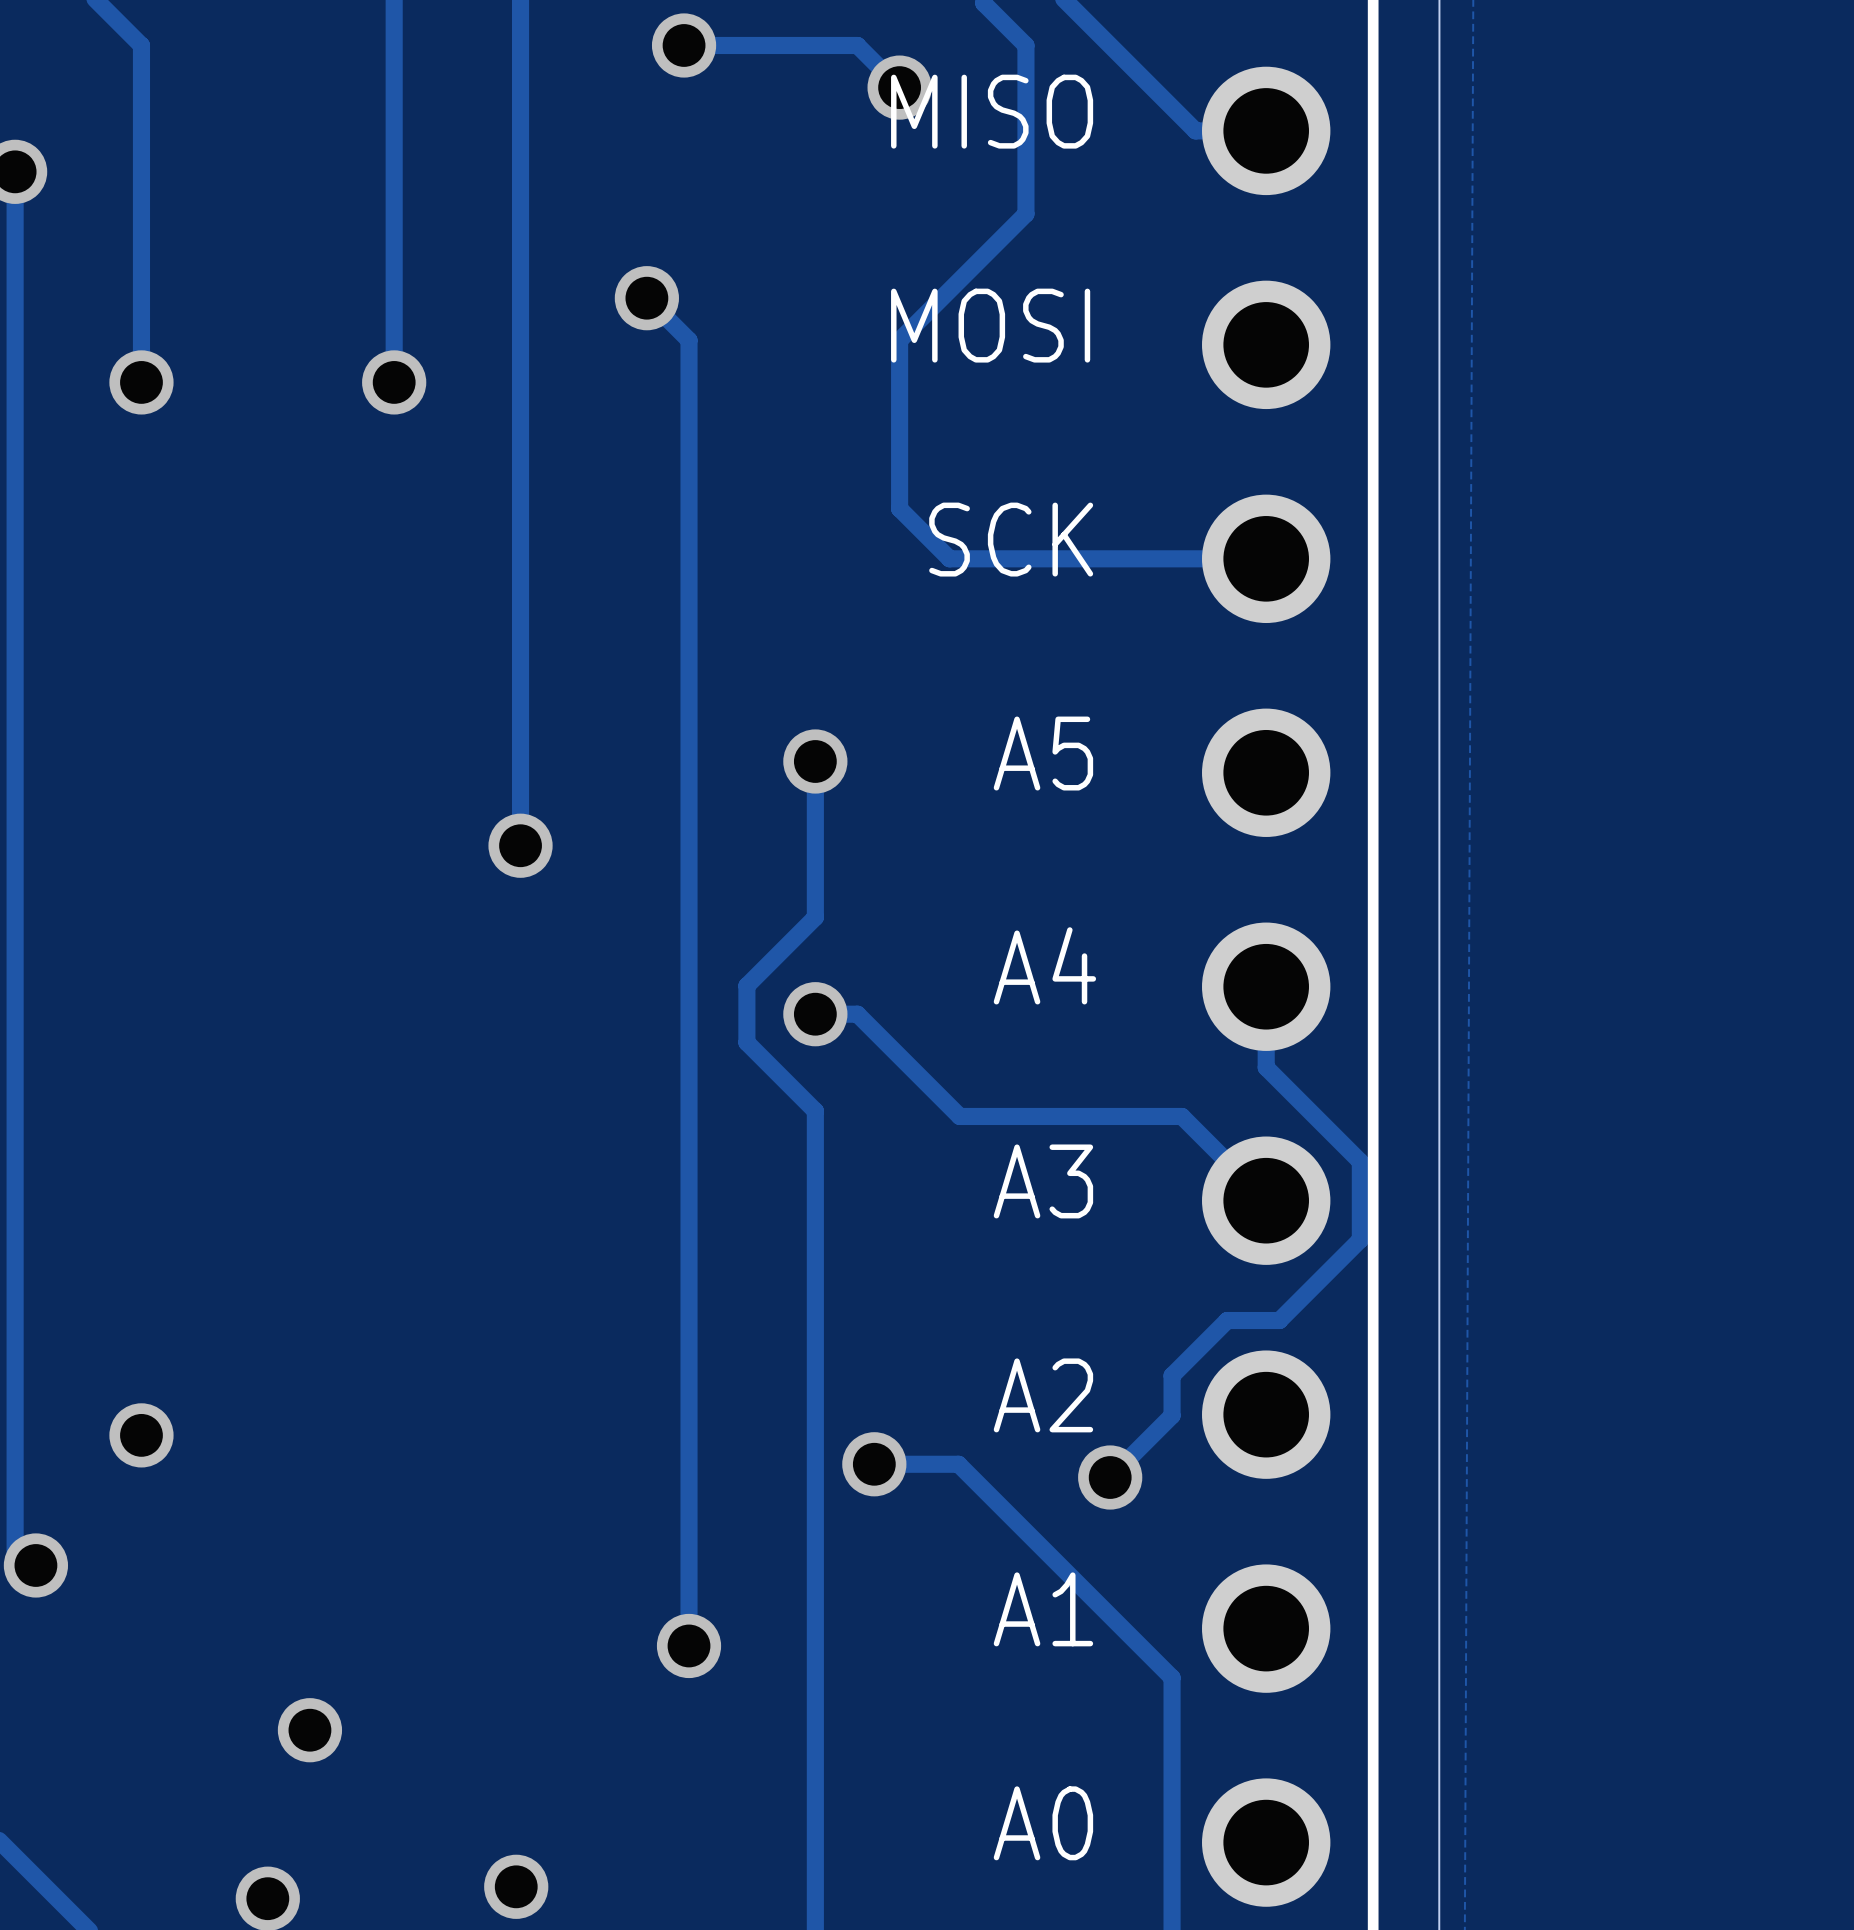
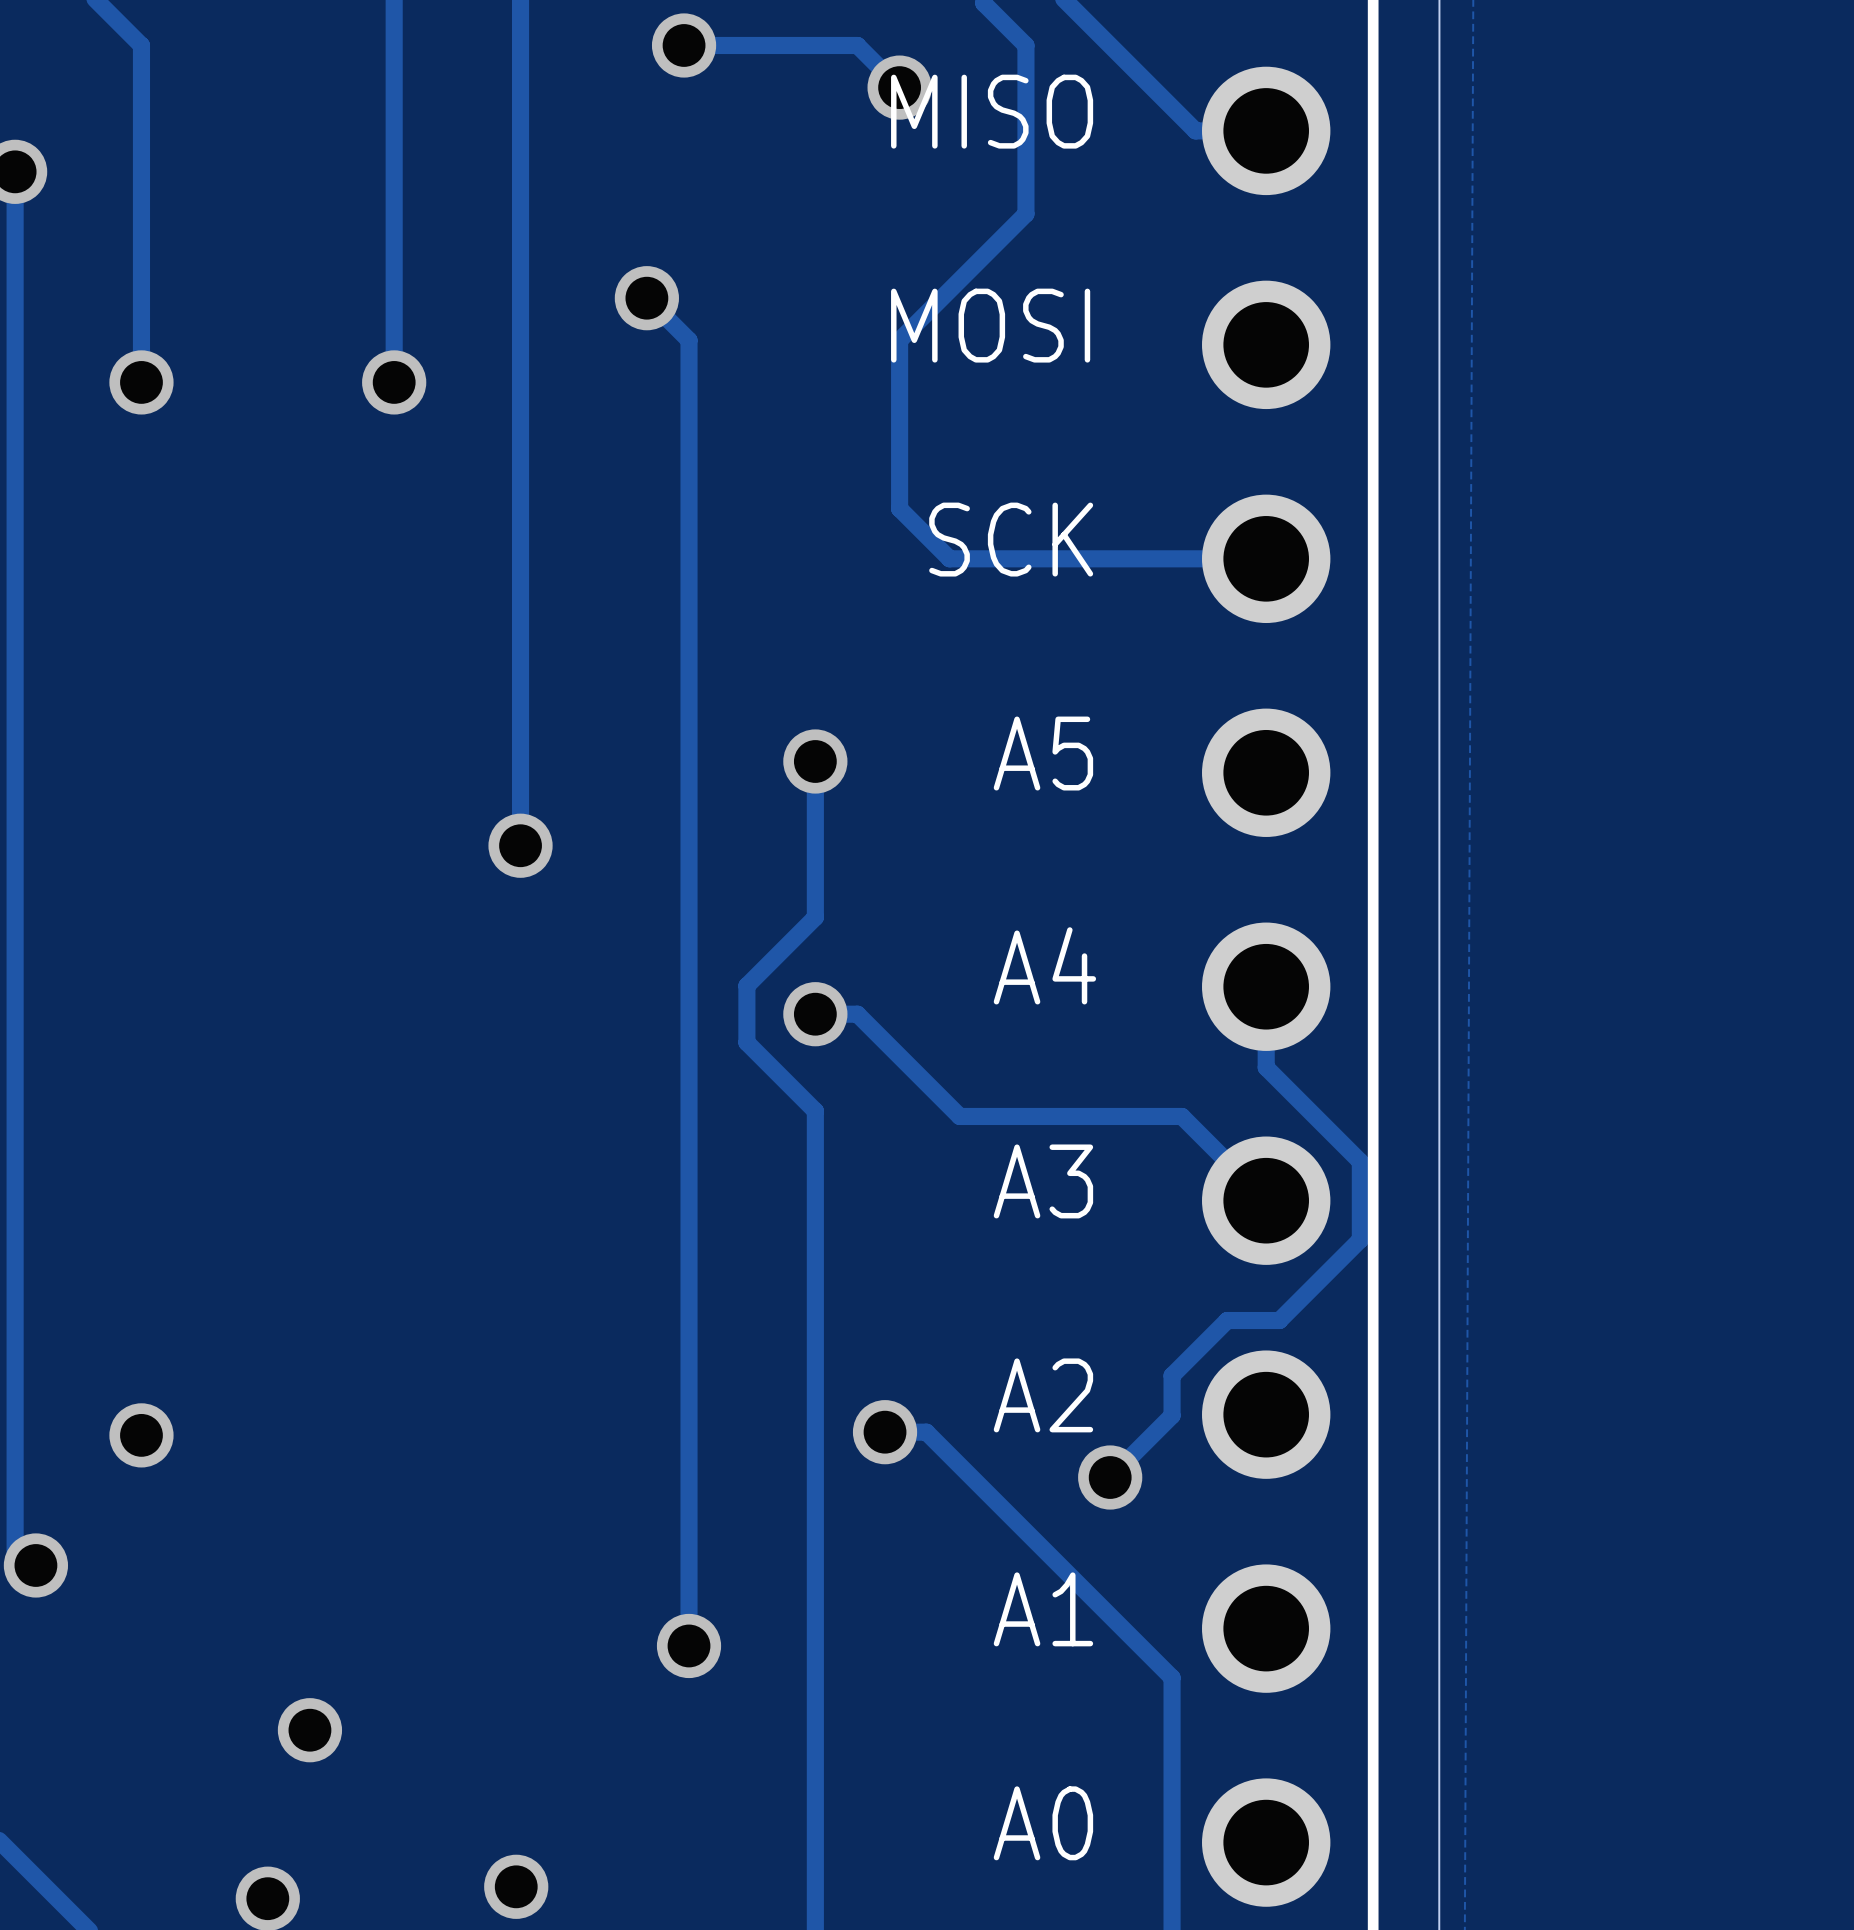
track: (874, 1464) (958, 1464) -> (885, 1432) (926, 1432) (958, 1464)
via position: (874, 1464) -> (885, 1432)

